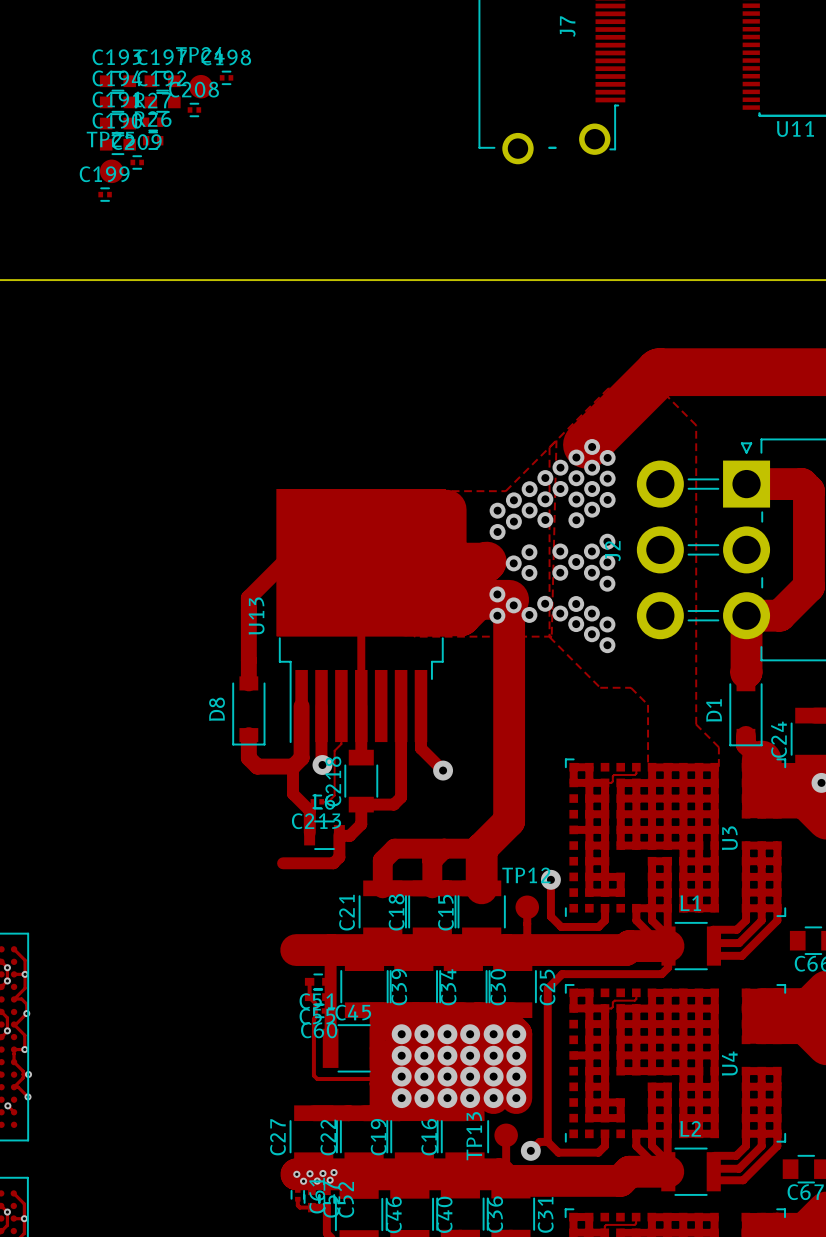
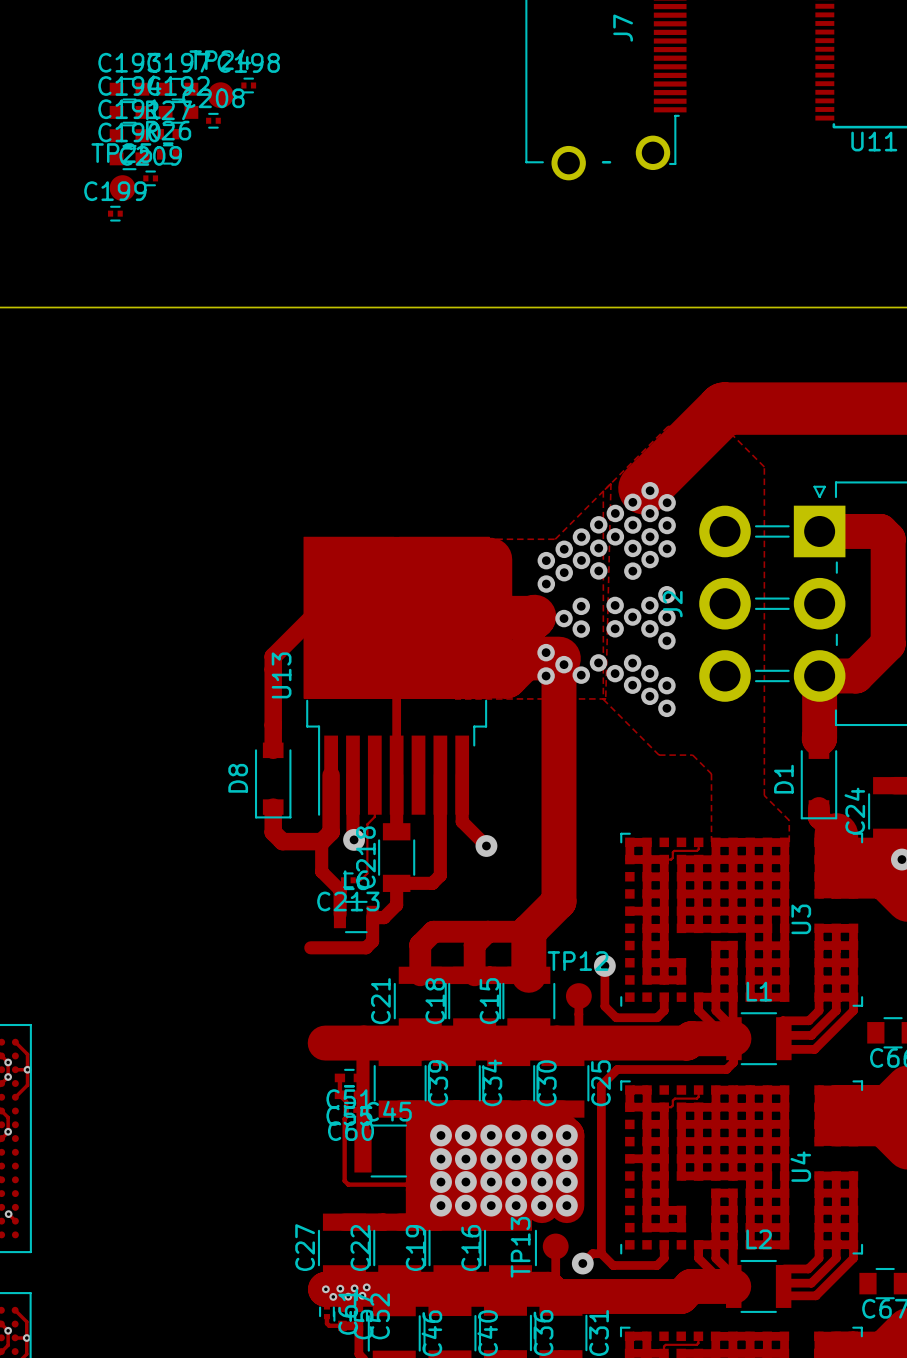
track: (14, 999) (21, 999) (26, 1004) (26, 1013) (14, 1024) (24, 1035) (24, 1049) (14, 1049) (14, 1062) (23, 1071) (23, 1077) (14, 1087) (18, 1087) (28, 1096) -> none
via: (26, 1013) -> none
via: (24, 1049) -> none
via: (28, 1074) -> none
via: (28, 1096) -> none

